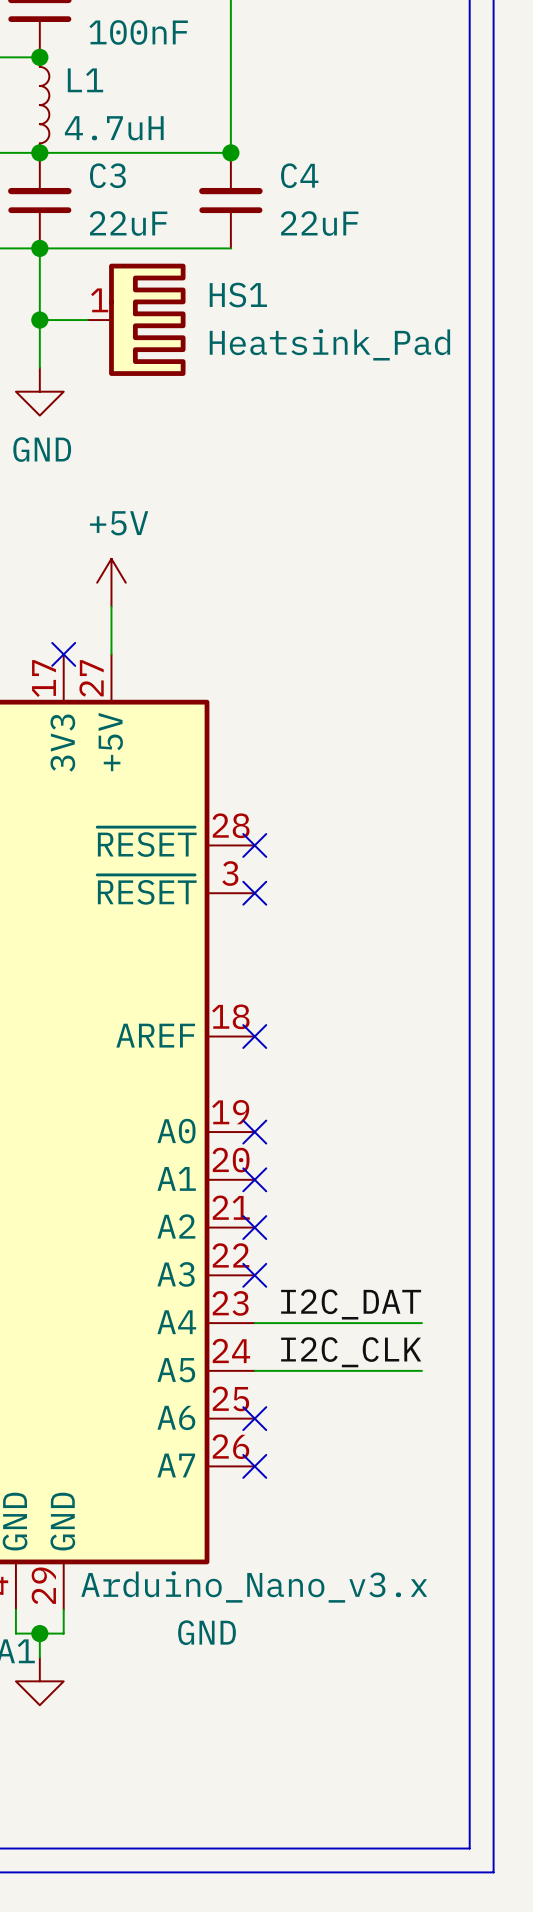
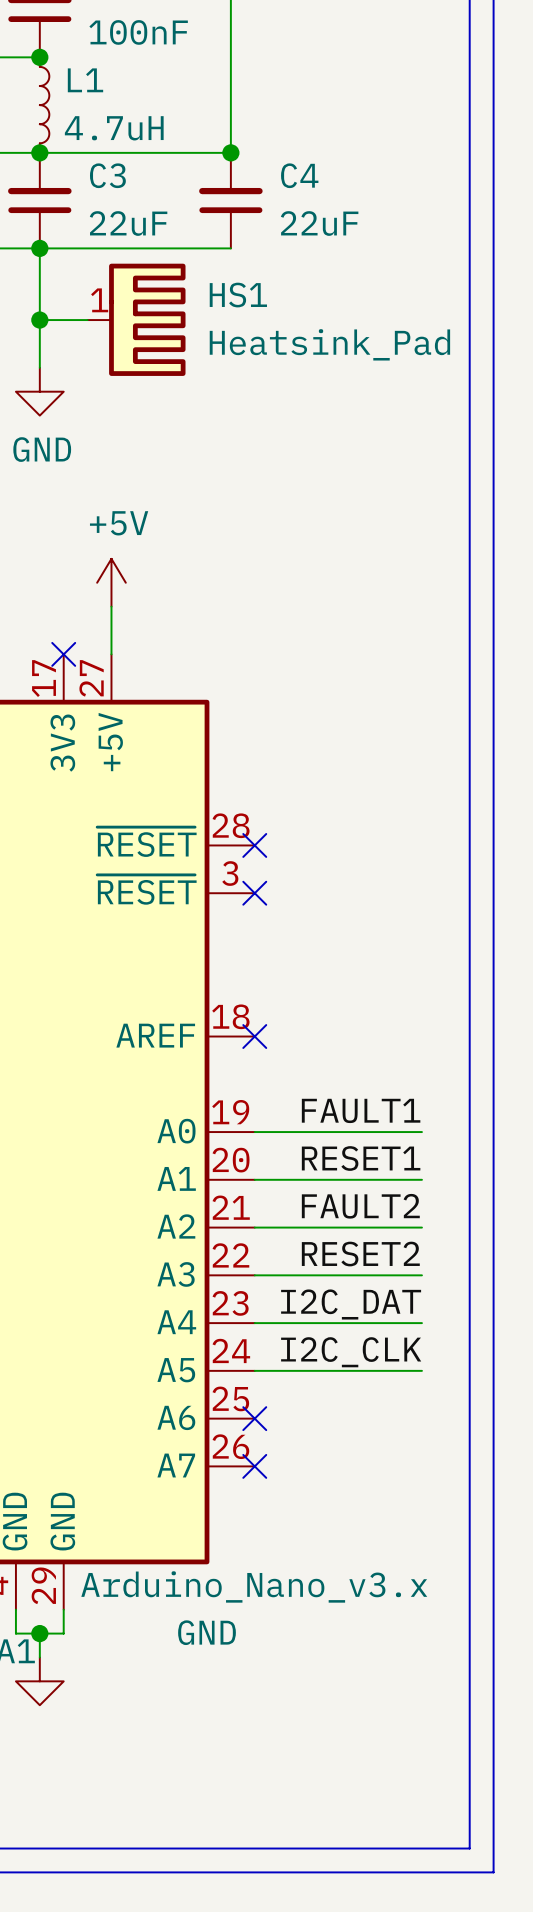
label: none -> FAULT1 (361, 1110)
wire: none -> (254, 1132) (421, 1132)
no-connect mark: (254, 1132) -> none
label: none -> RESET1 (361, 1158)
wire: none -> (254, 1179) (421, 1179)
no-connect mark: (254, 1179) -> none
label: none -> FAULT2 (360, 1206)
wire: none -> (254, 1227) (421, 1227)
no-connect mark: (254, 1227) -> none
label: none -> RESET2 (360, 1254)
wire: none -> (254, 1275) (421, 1275)
no-connect mark: (254, 1275) -> none

